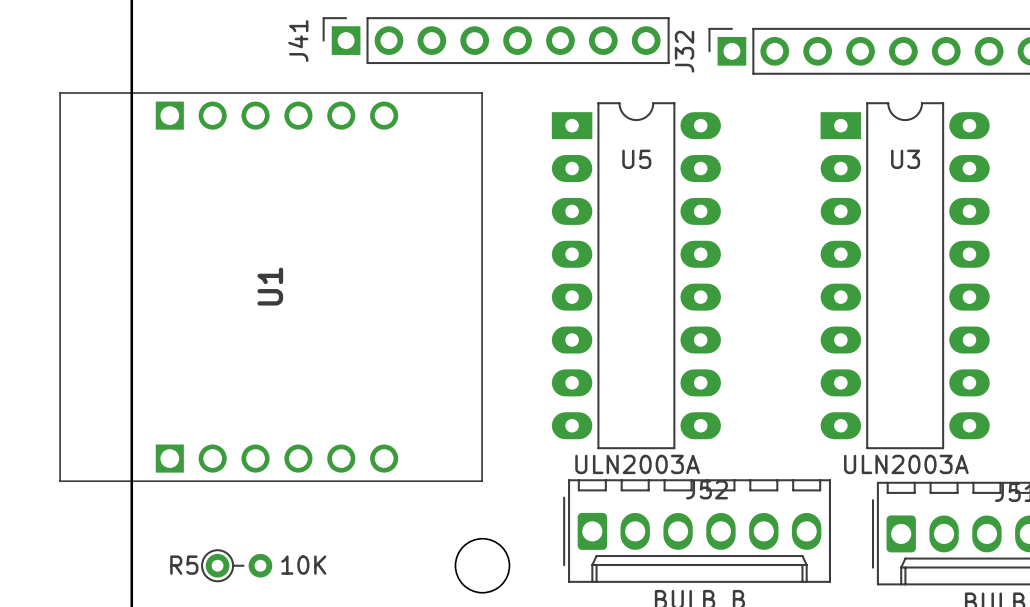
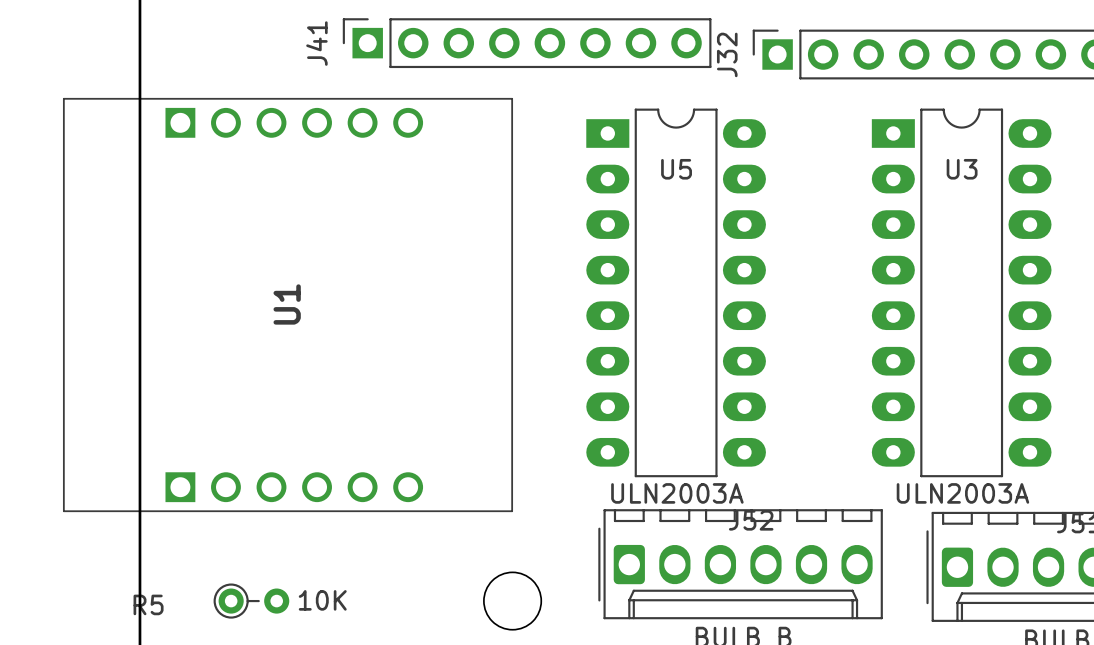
R5 name position: R5 (184, 565) -> R5 (148, 604)

